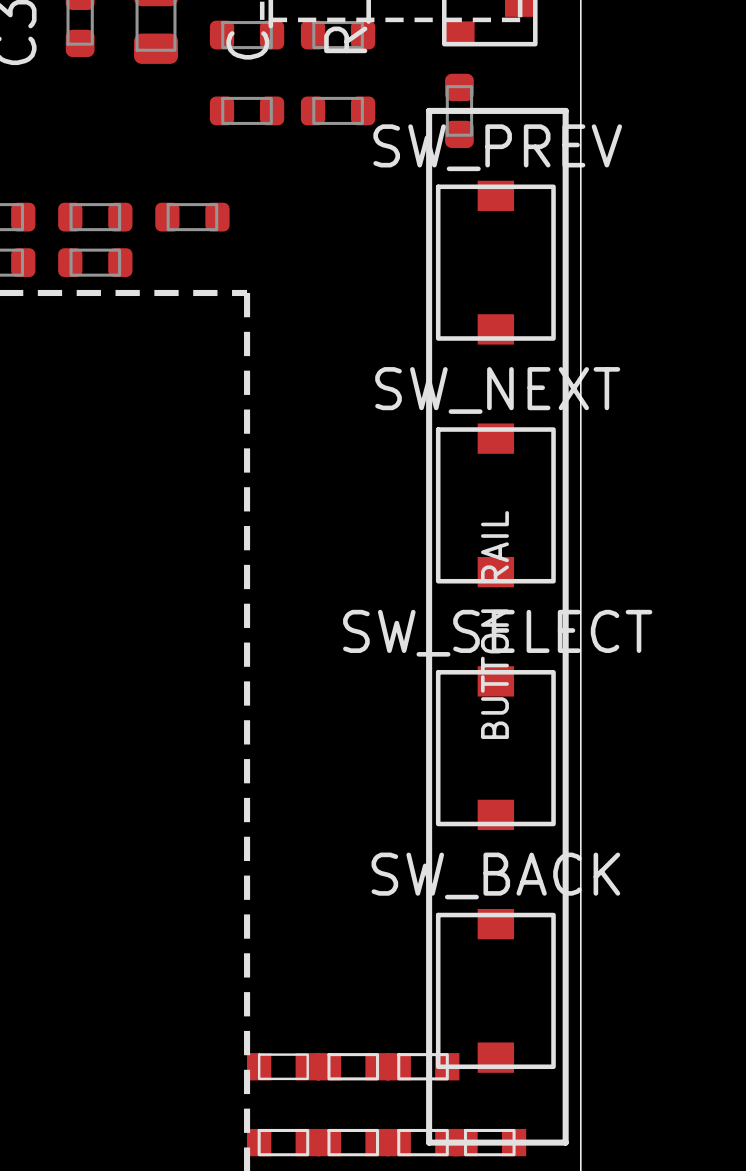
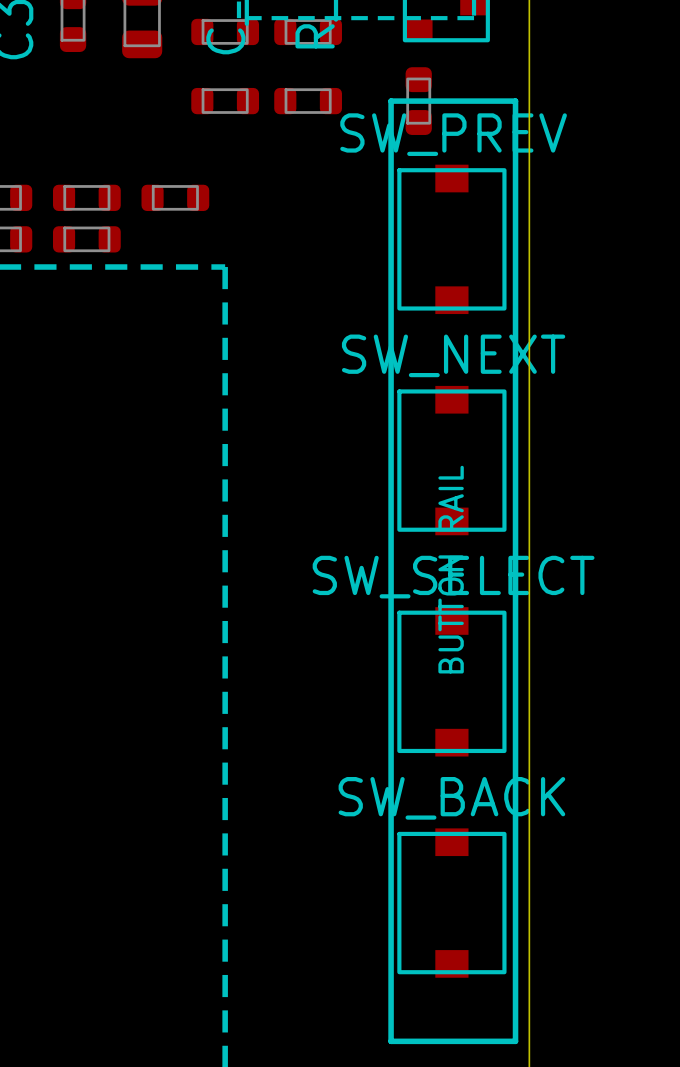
part: (283, 1066) -> none
part: (353, 1066) -> none
part: (423, 1066) -> none
part: (283, 1142) -> none
part: (353, 1142) -> none
part: (423, 1142) -> none
part: (489, 1142) -> none

